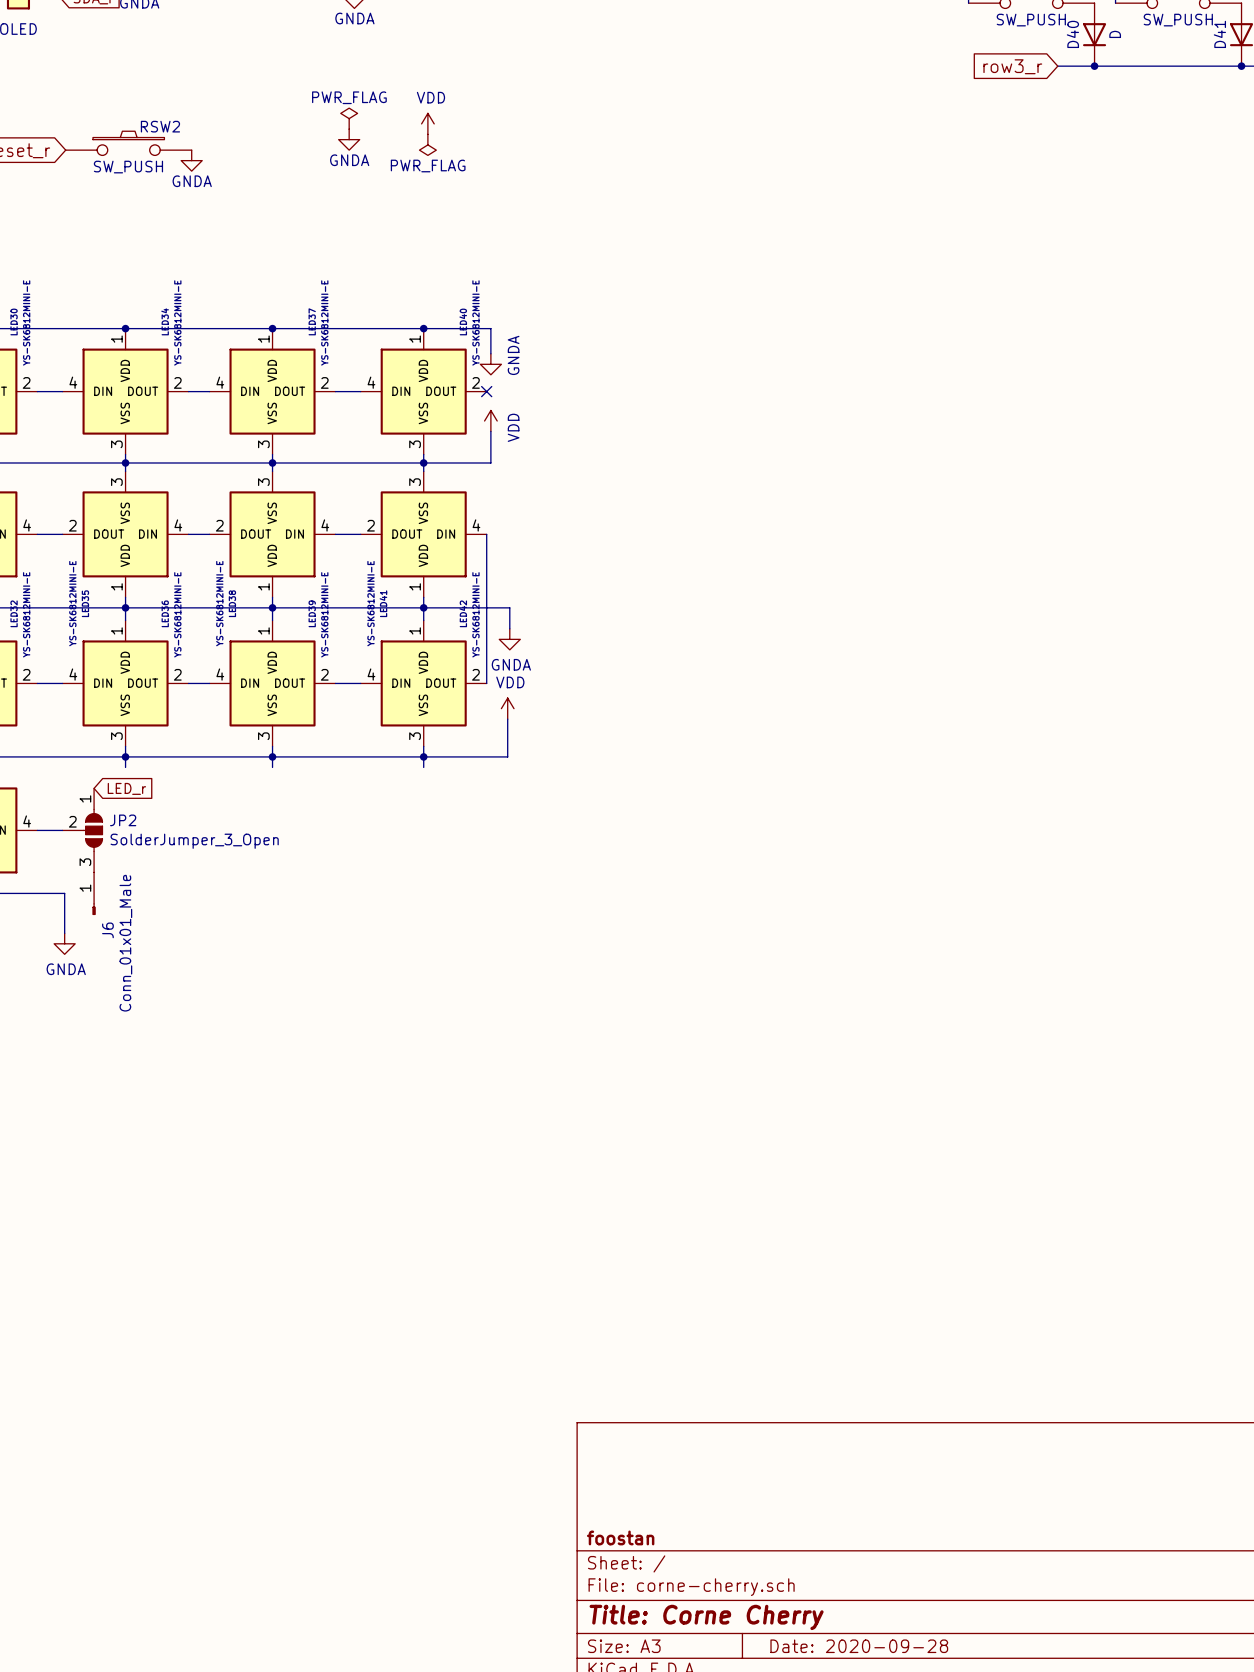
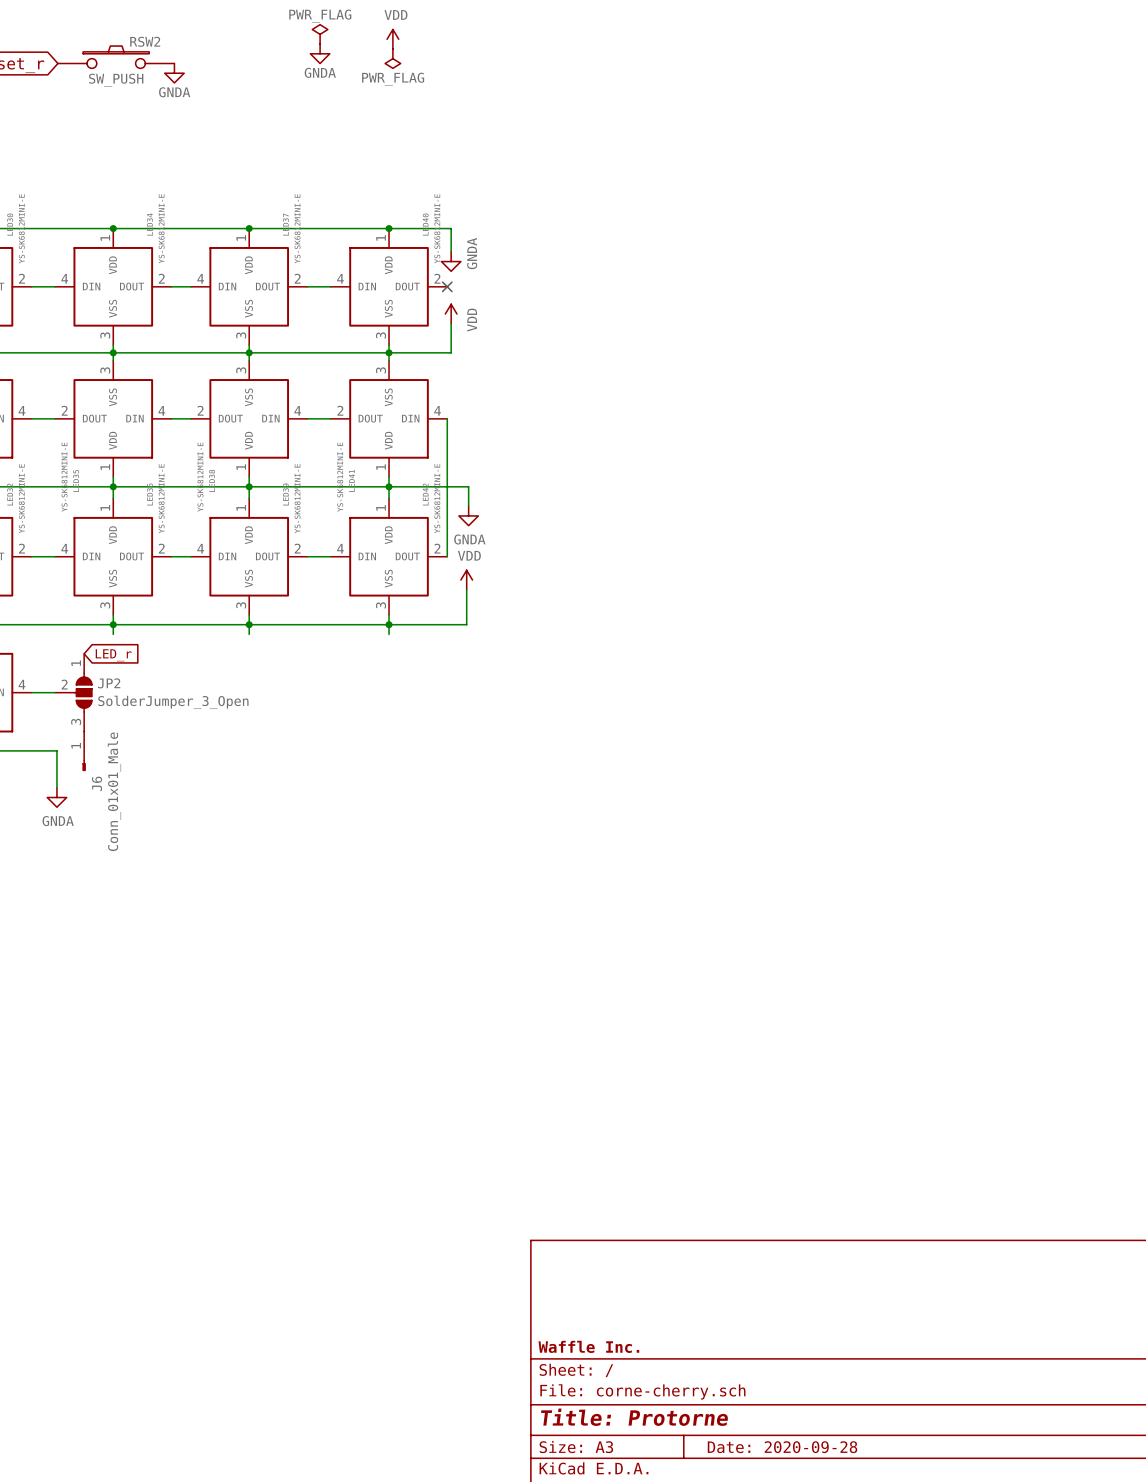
title block: foostan (620, 1537) -> Waffle Inc. (588, 1346)
title block: Title: Corne Cherry (706, 1617) -> Title: Protorne (634, 1417)

